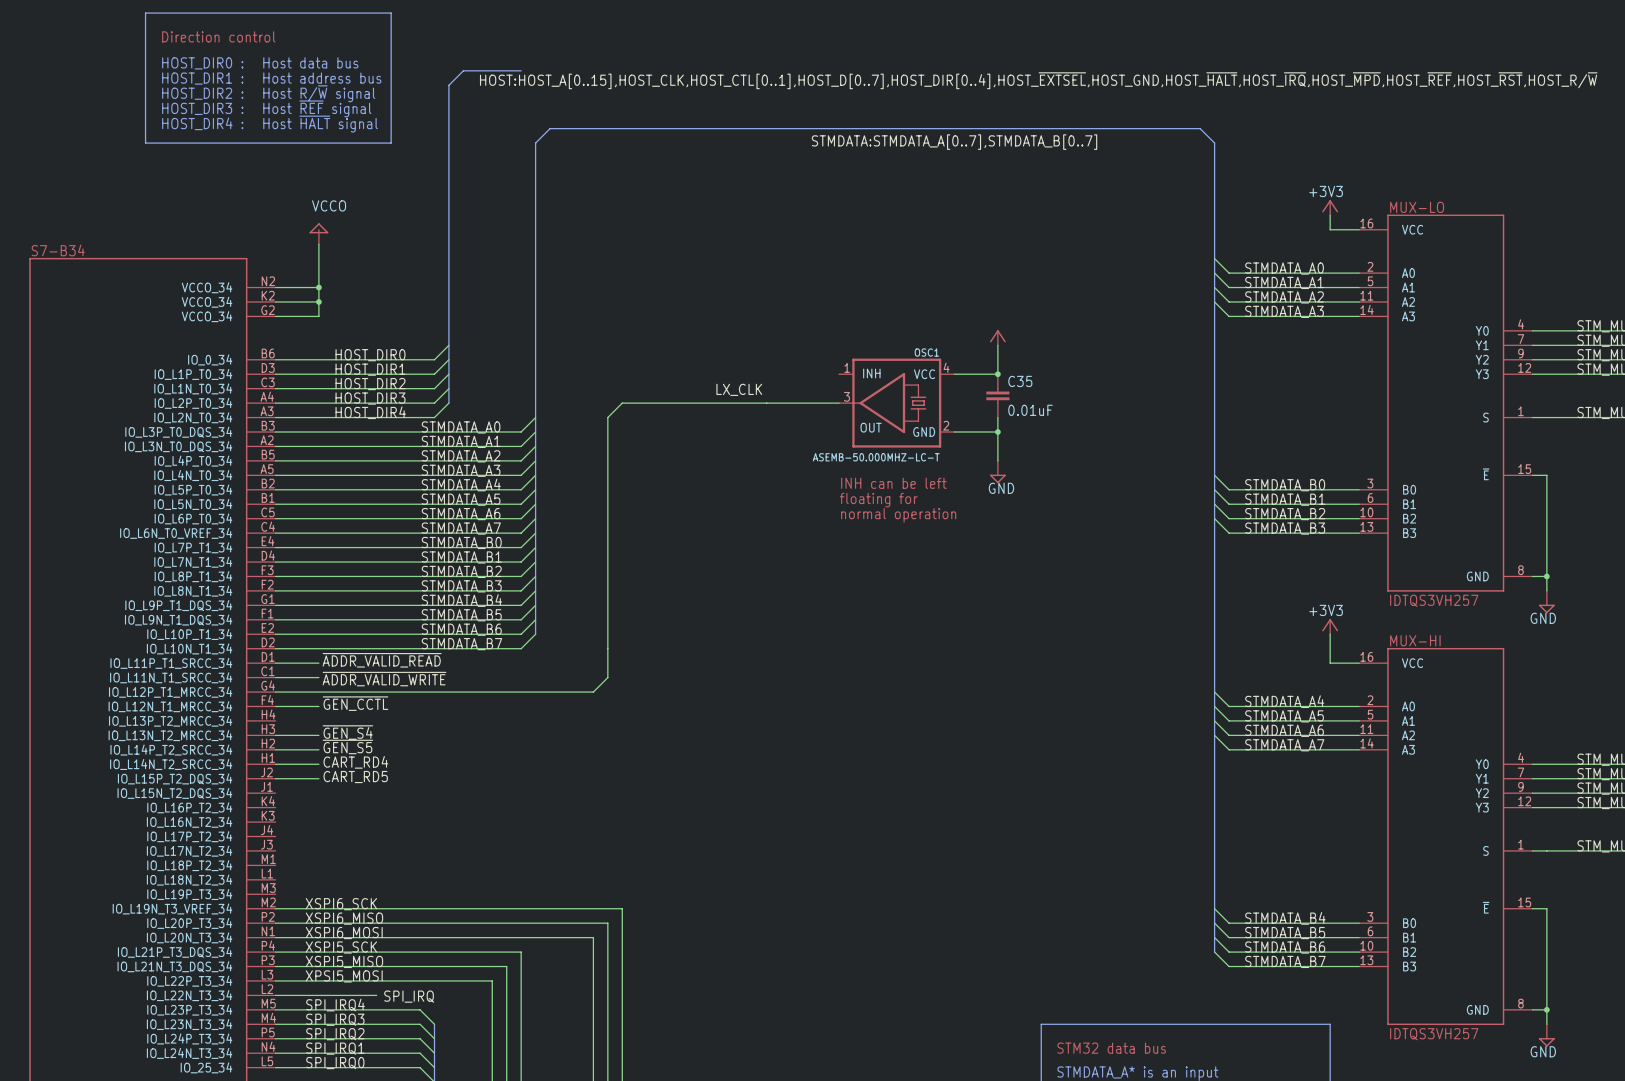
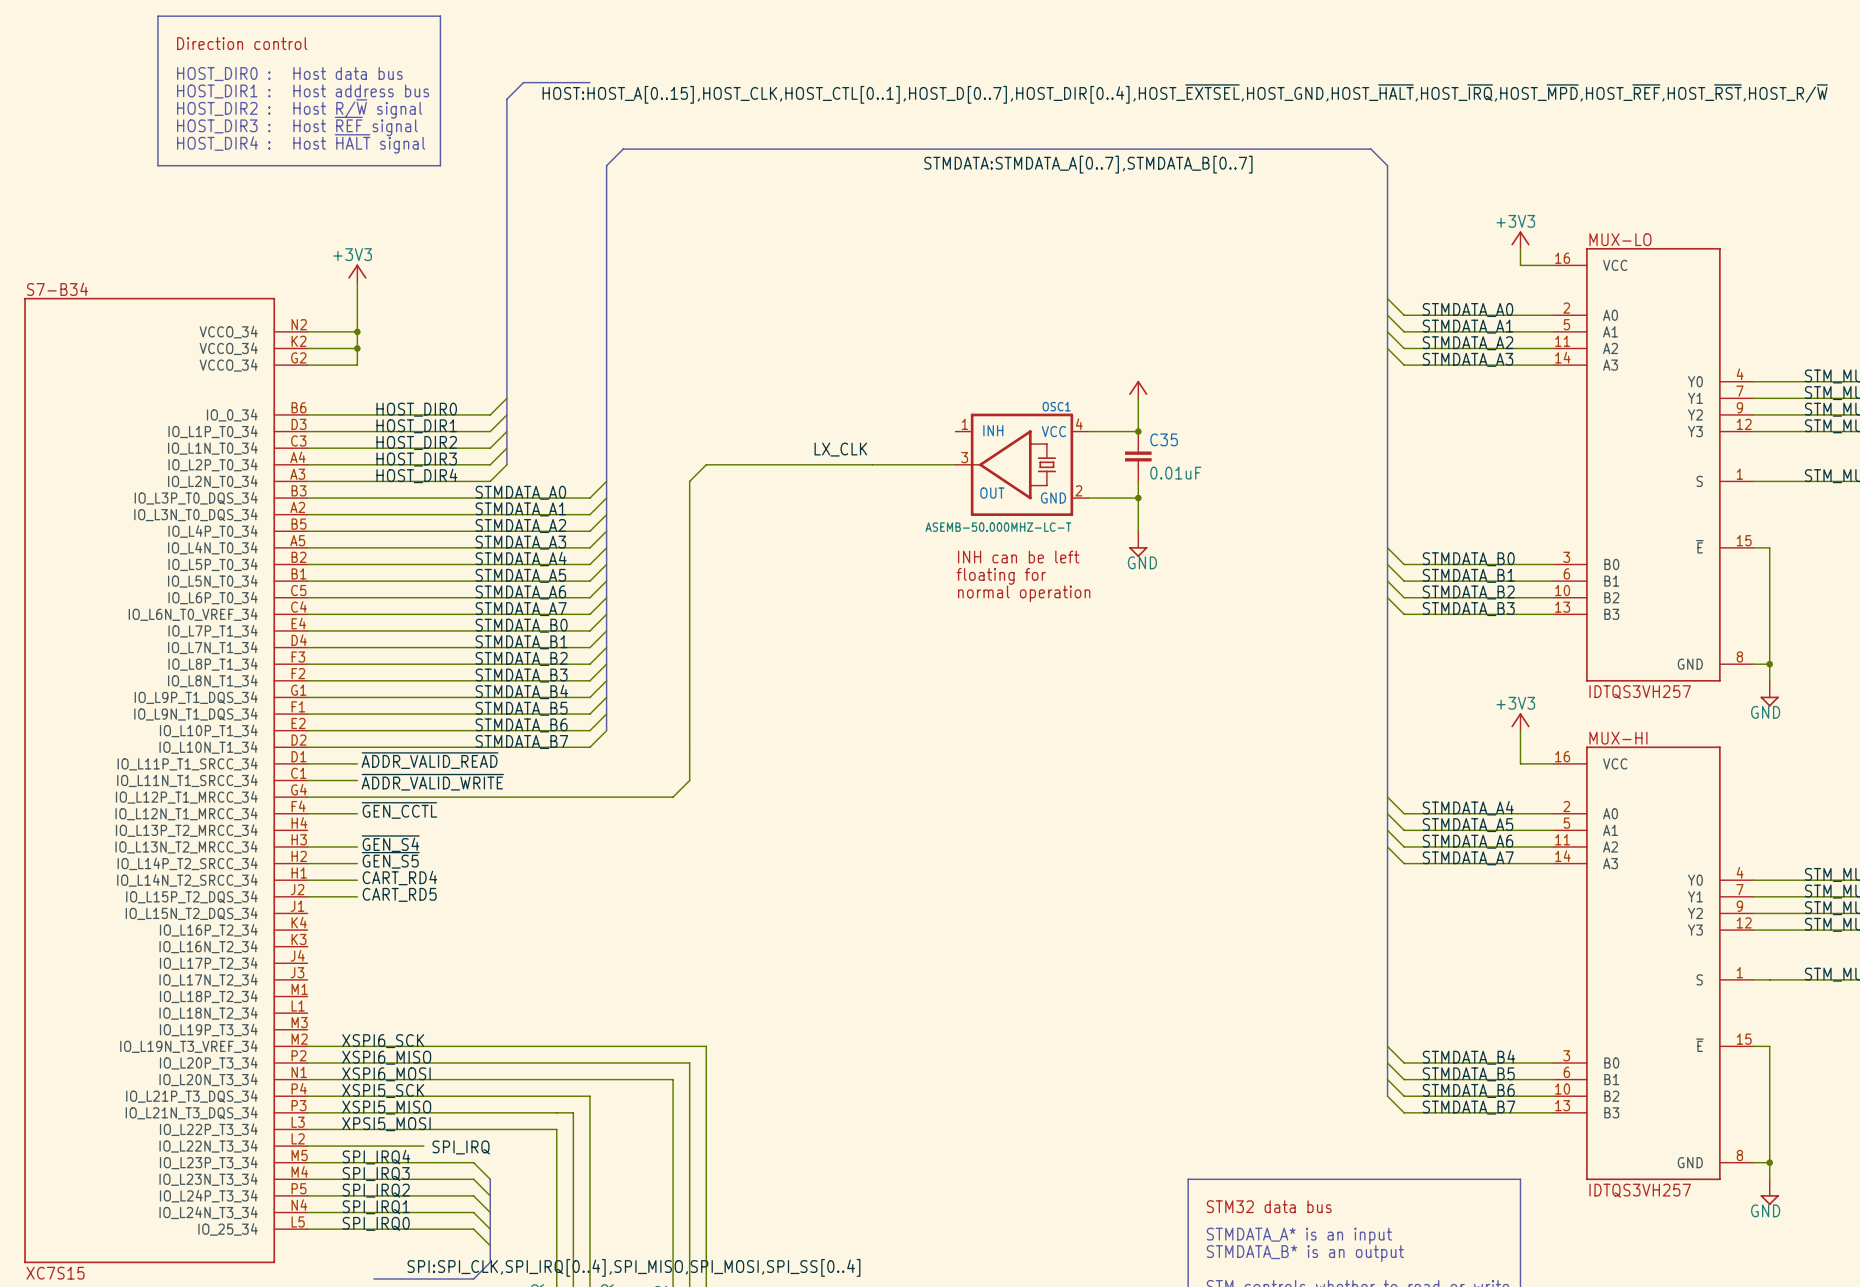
power symbol: VCCO (318, 233) -> +3V3 (357, 273)

